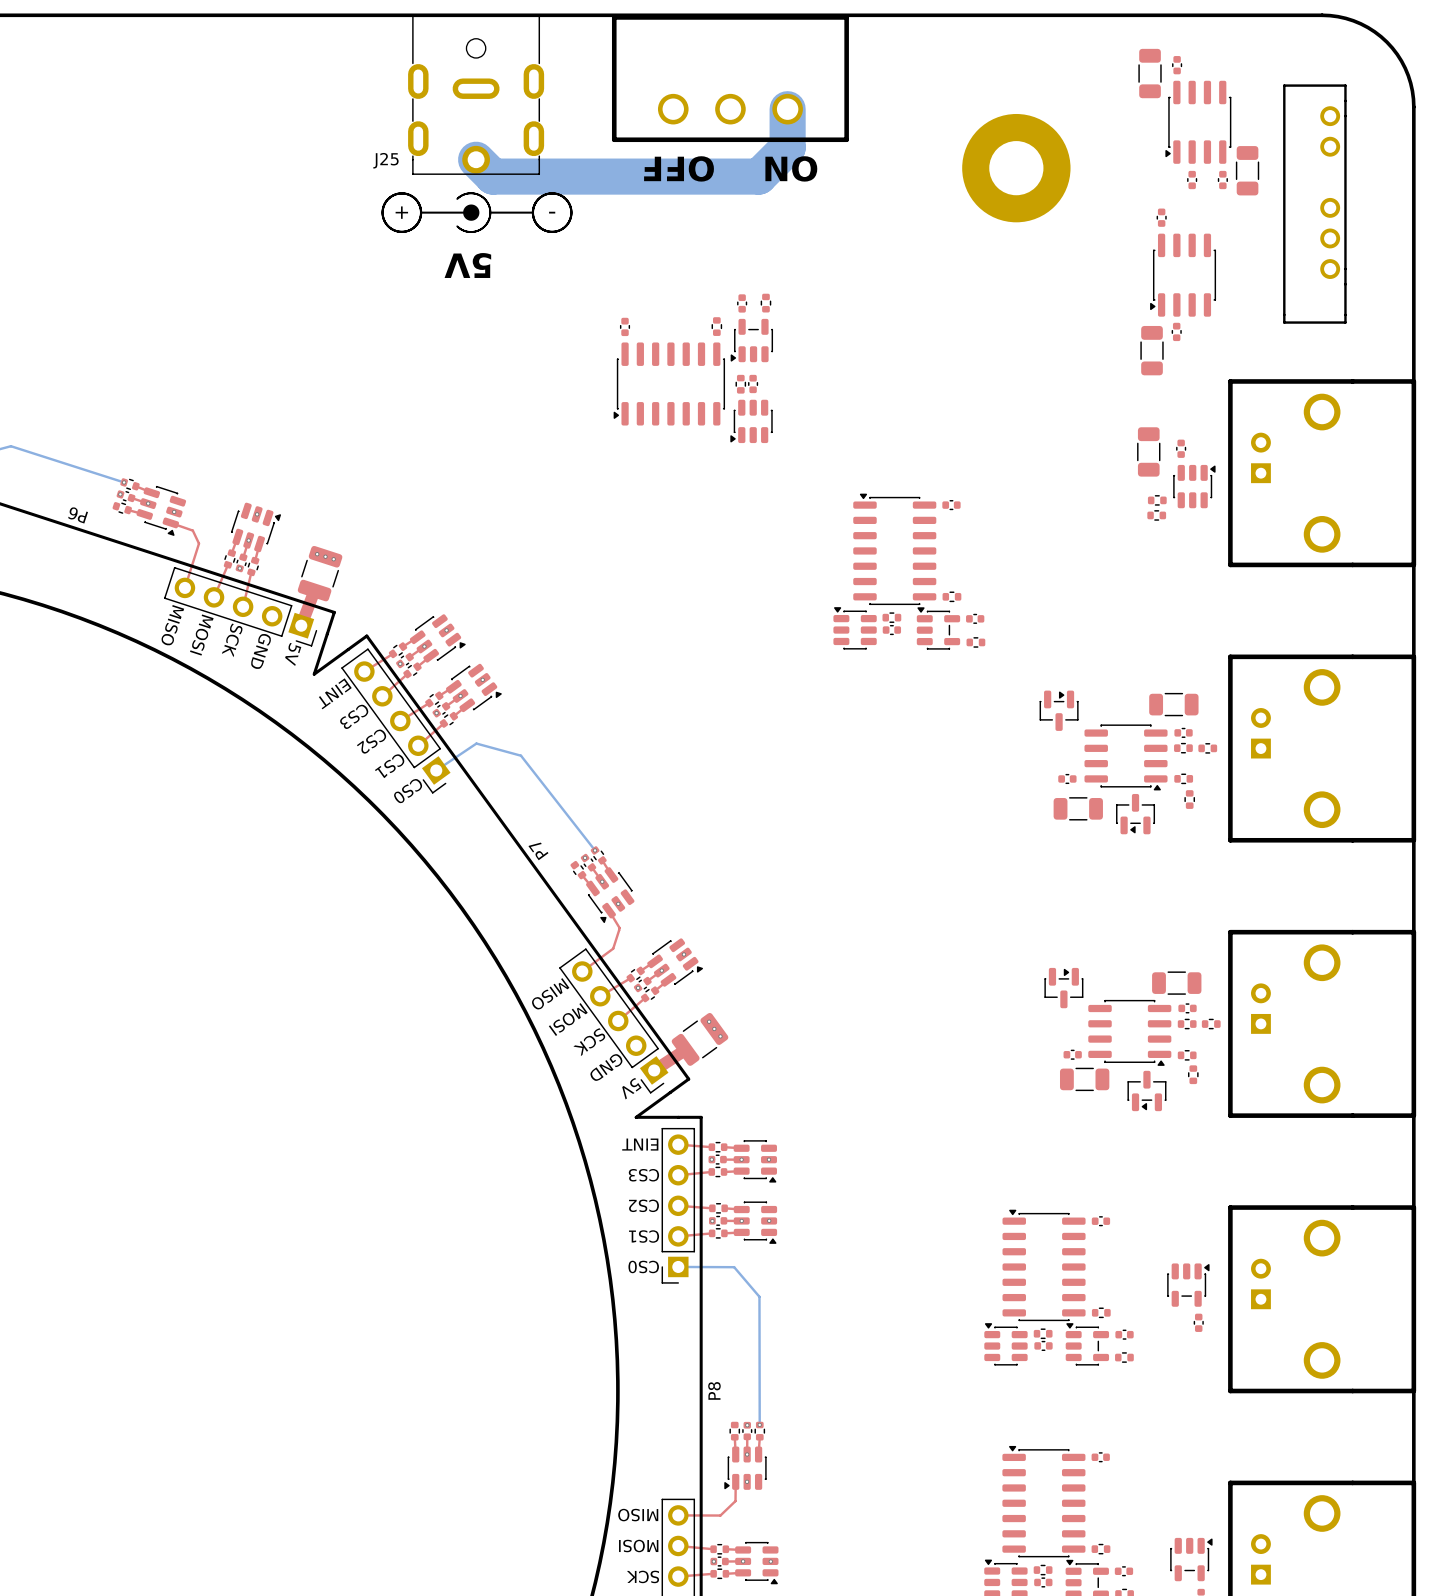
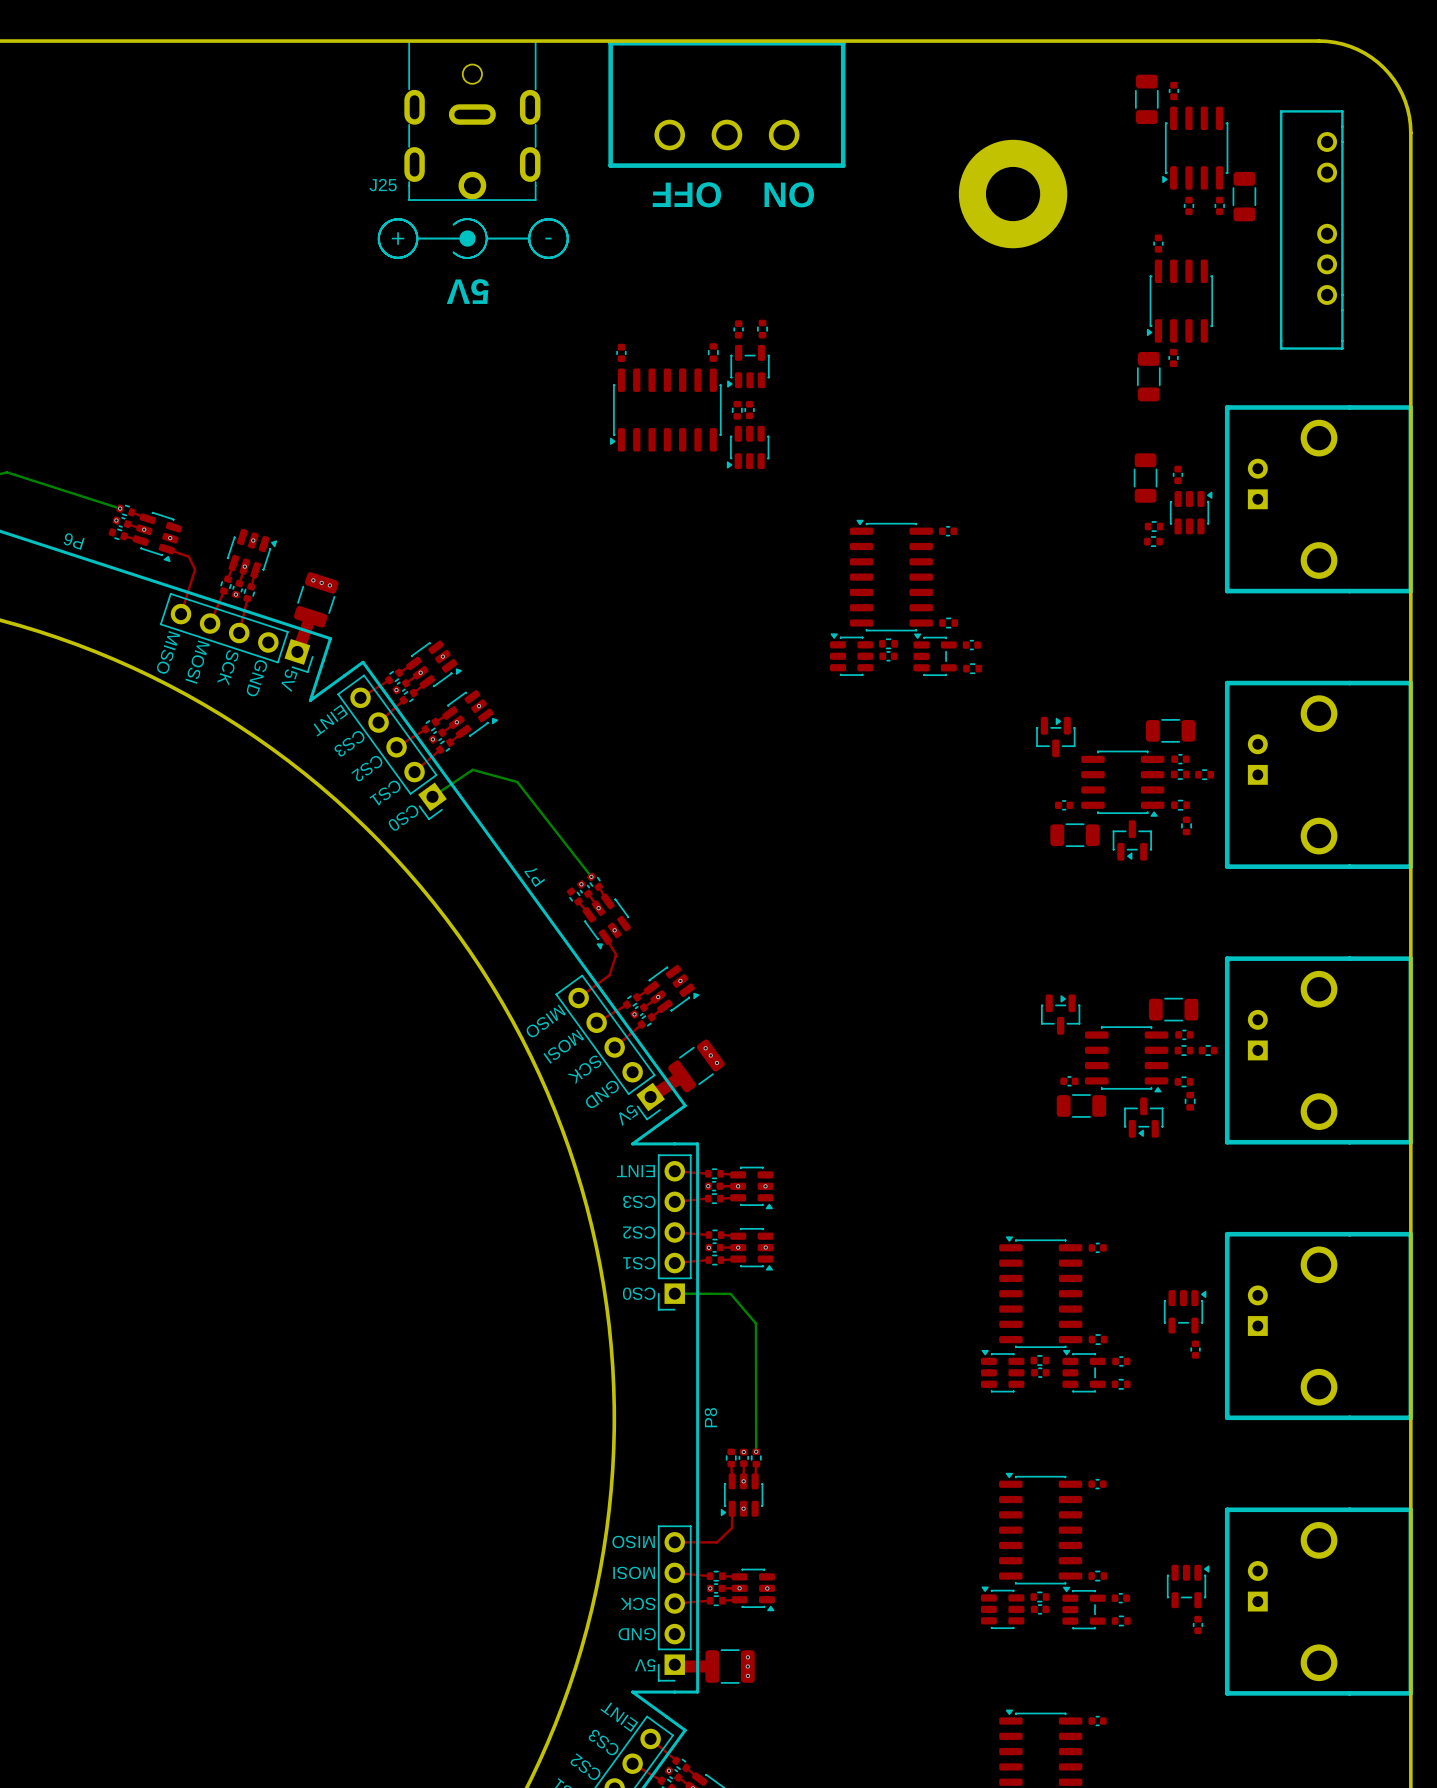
bottom track: (787, 109) (787, 147) (758, 176) (492, 176) (476, 159) -> none

